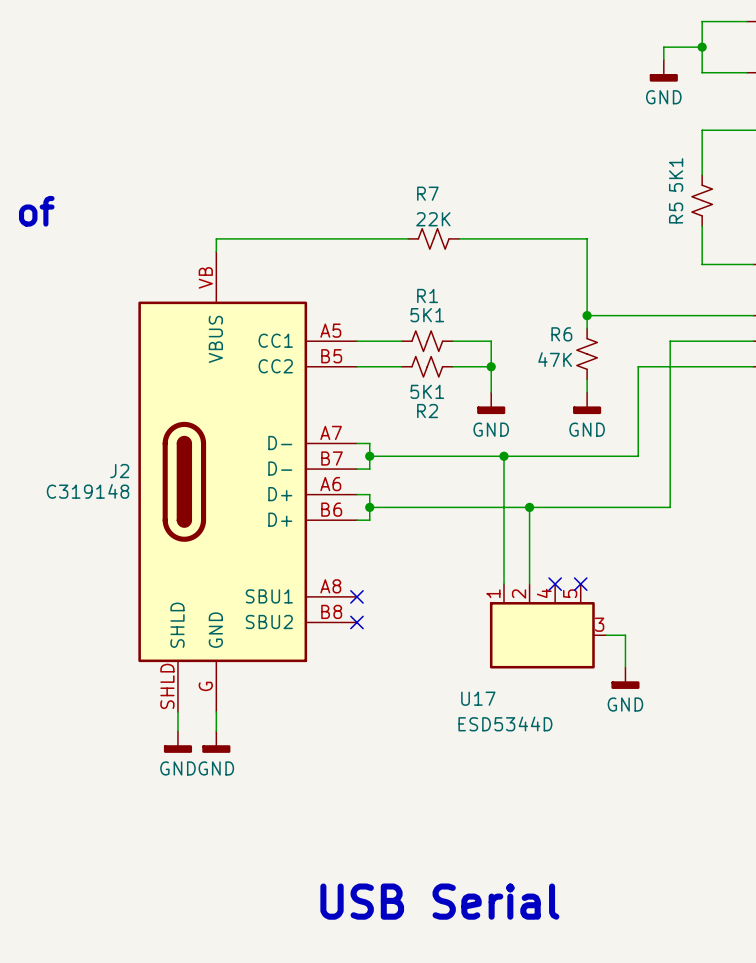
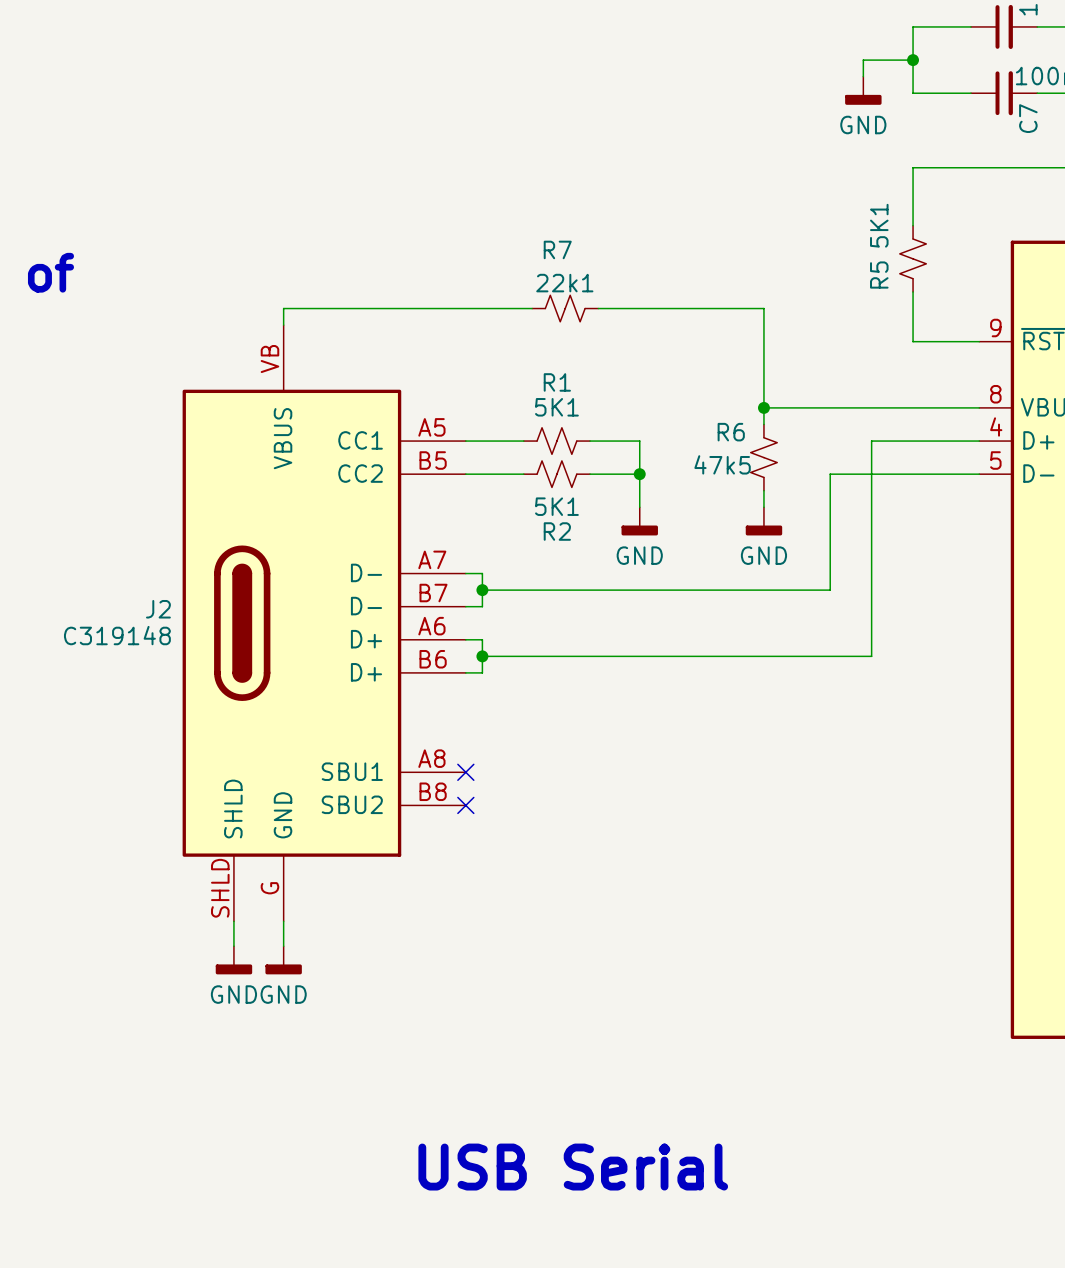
R7 value: 22K (433, 219) -> 22k1 (564, 283)
R6 value: 47K (555, 359) -> 47k5 (722, 464)
wire: (503, 456) (503, 584) -> none
junction: (503, 456) -> none
wire: (529, 507) (529, 584) -> none
junction: (529, 507) -> none
no-connect mark: (555, 584) -> none
no-connect mark: (580, 584) -> none
U17: ESD5344D (548, 626) -> none
wire: (606, 635) (625, 635) (625, 667) -> none
power symbol: GND (625, 678) -> none

